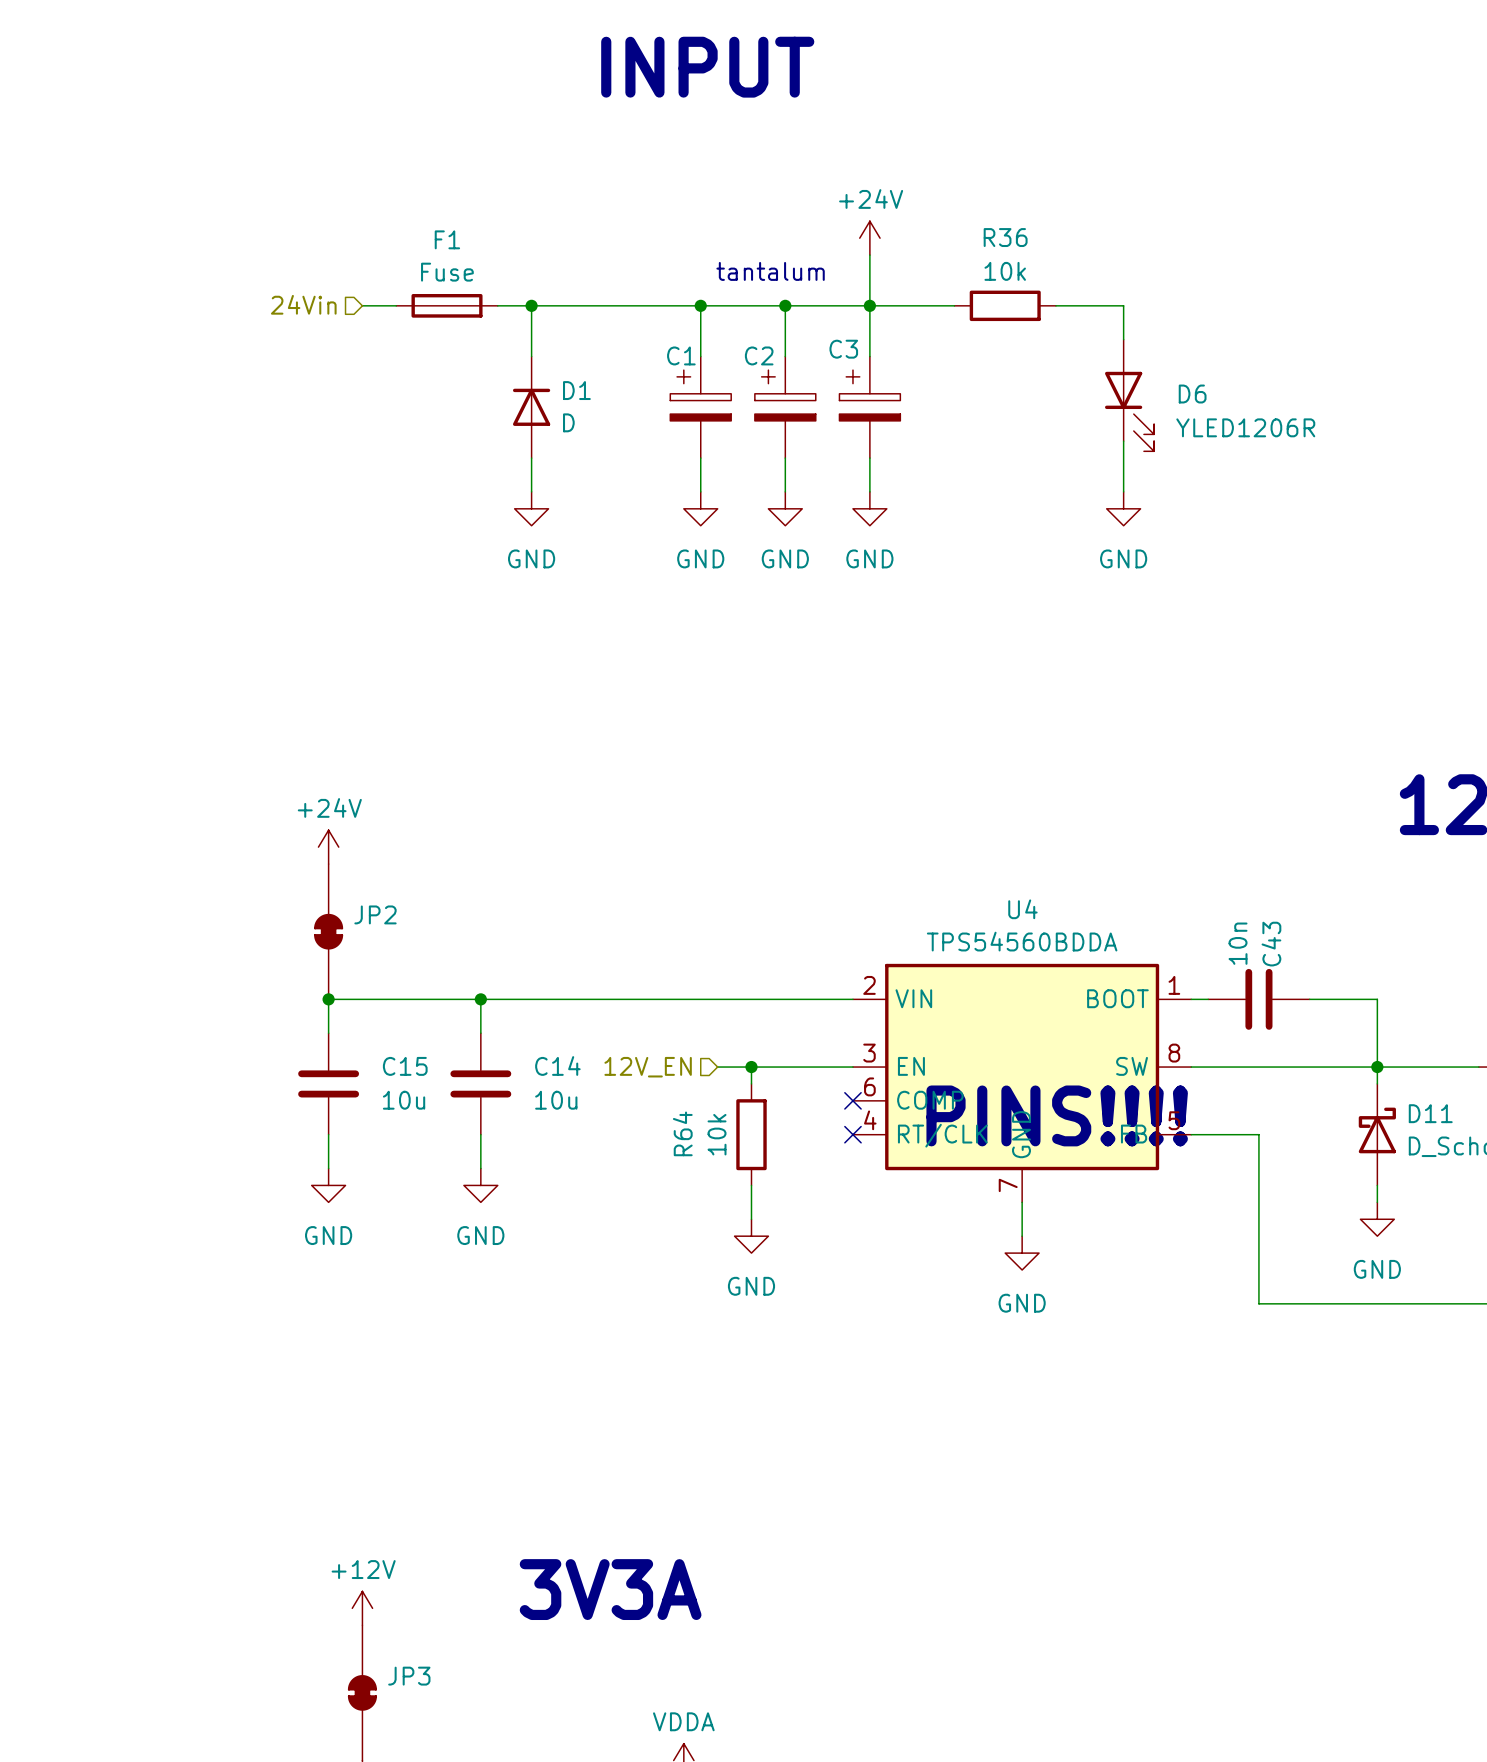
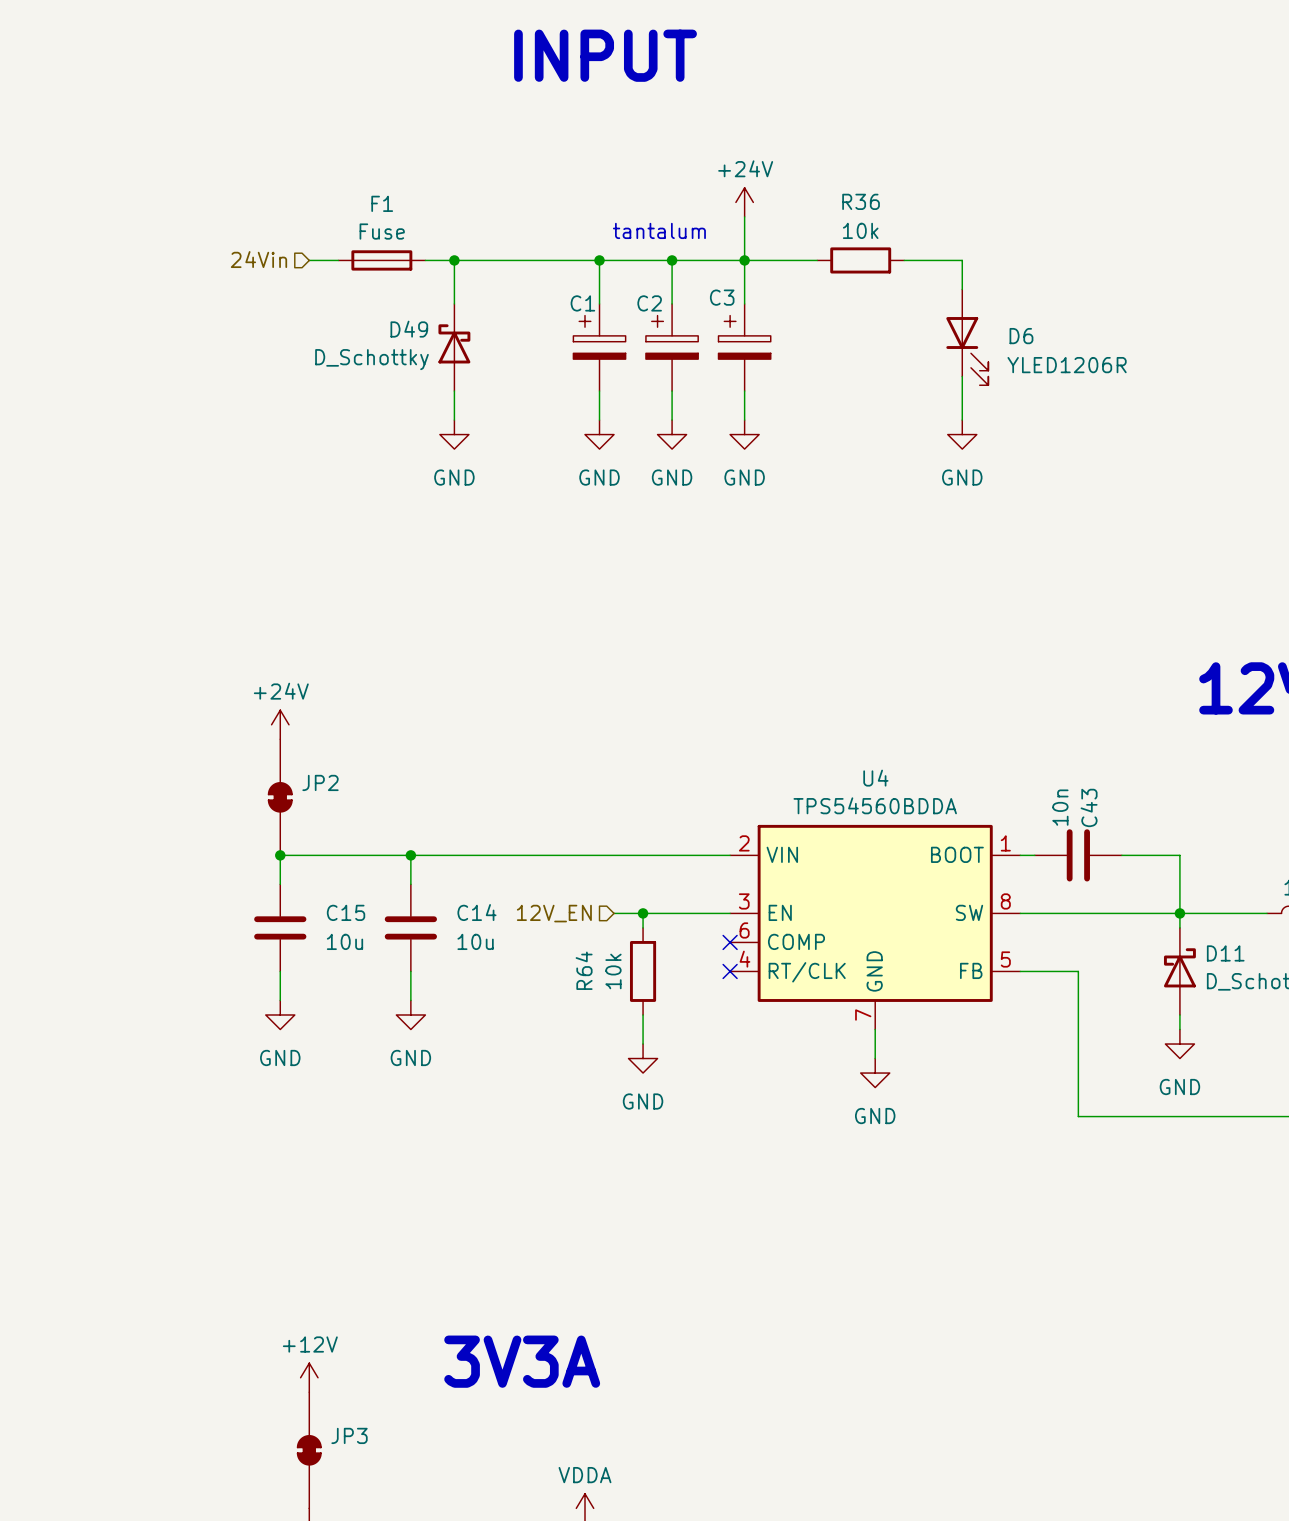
D1: D (531, 407) -> none
D49: none -> D_Schottky (454, 347)
text: PINS!!!! (1057, 1115) -> none

